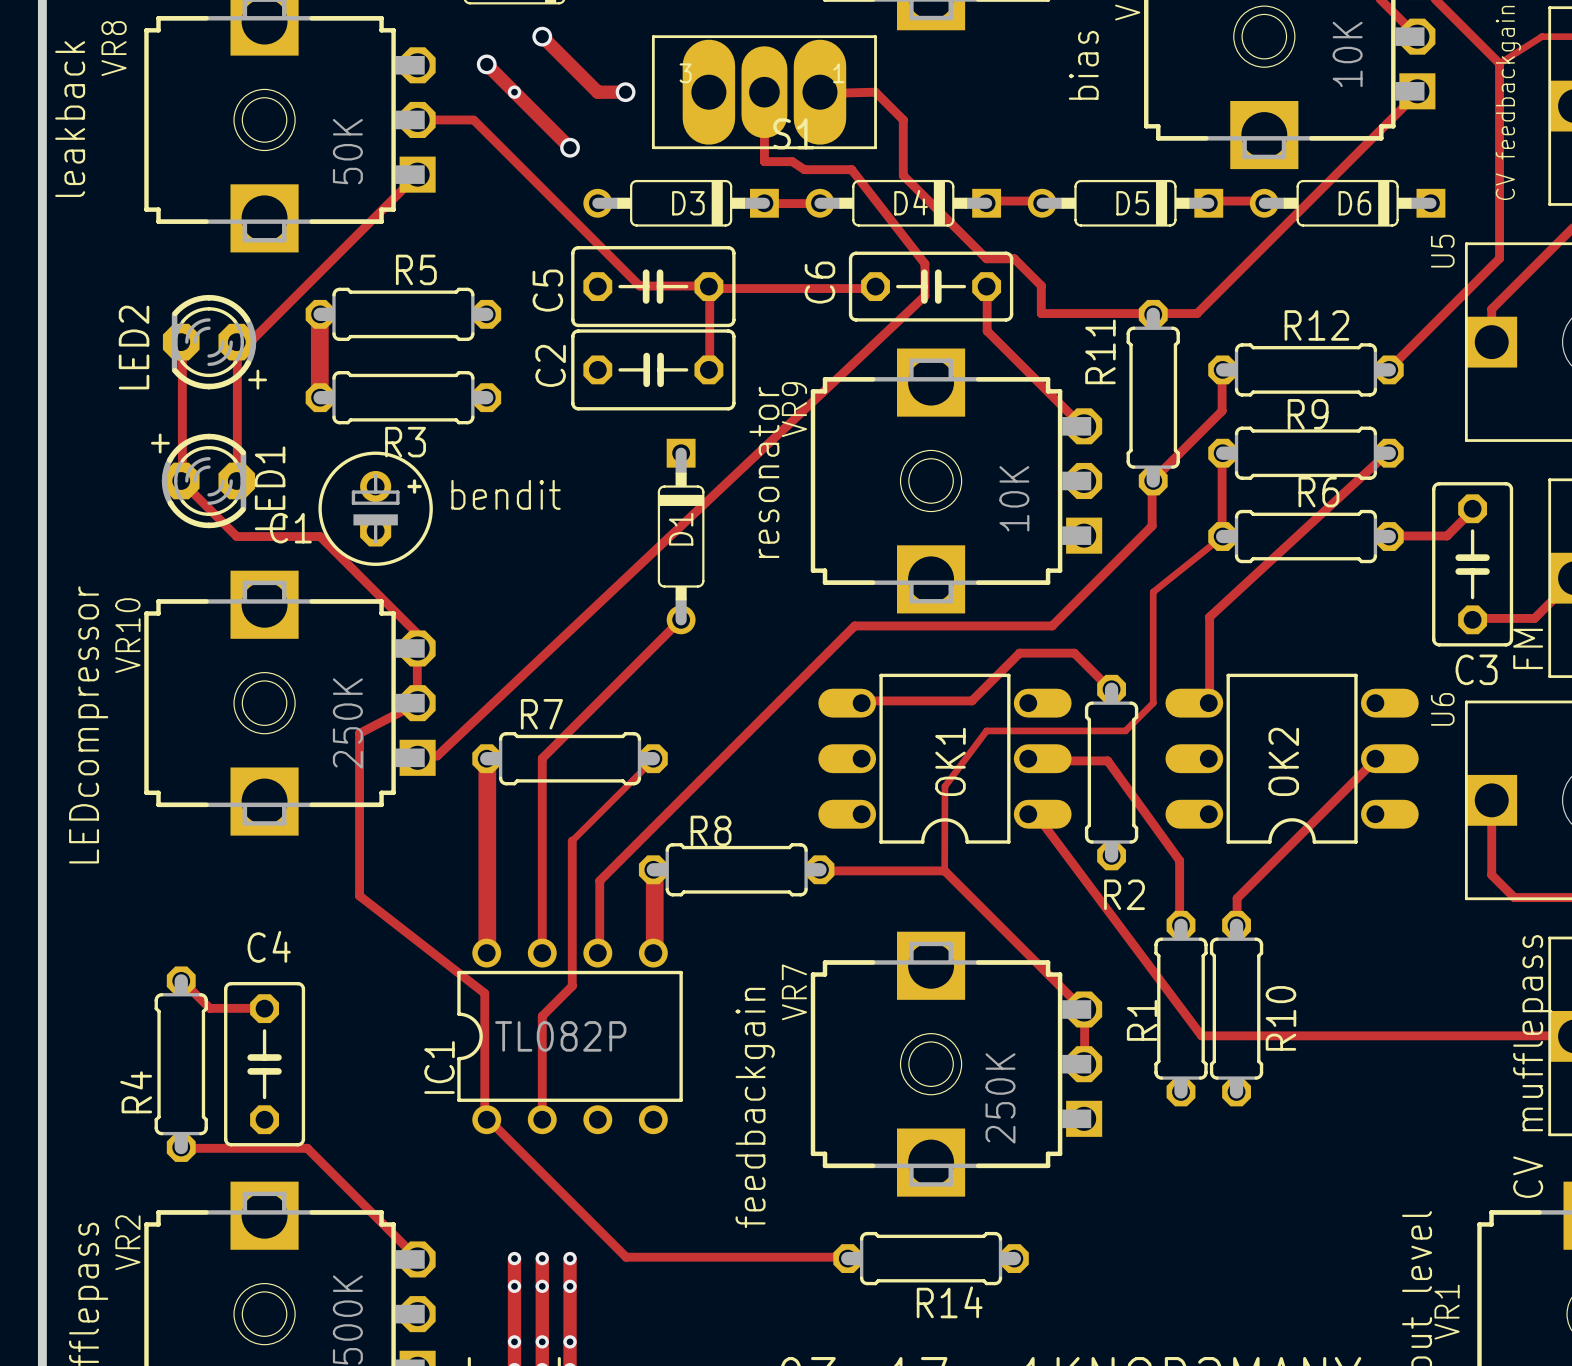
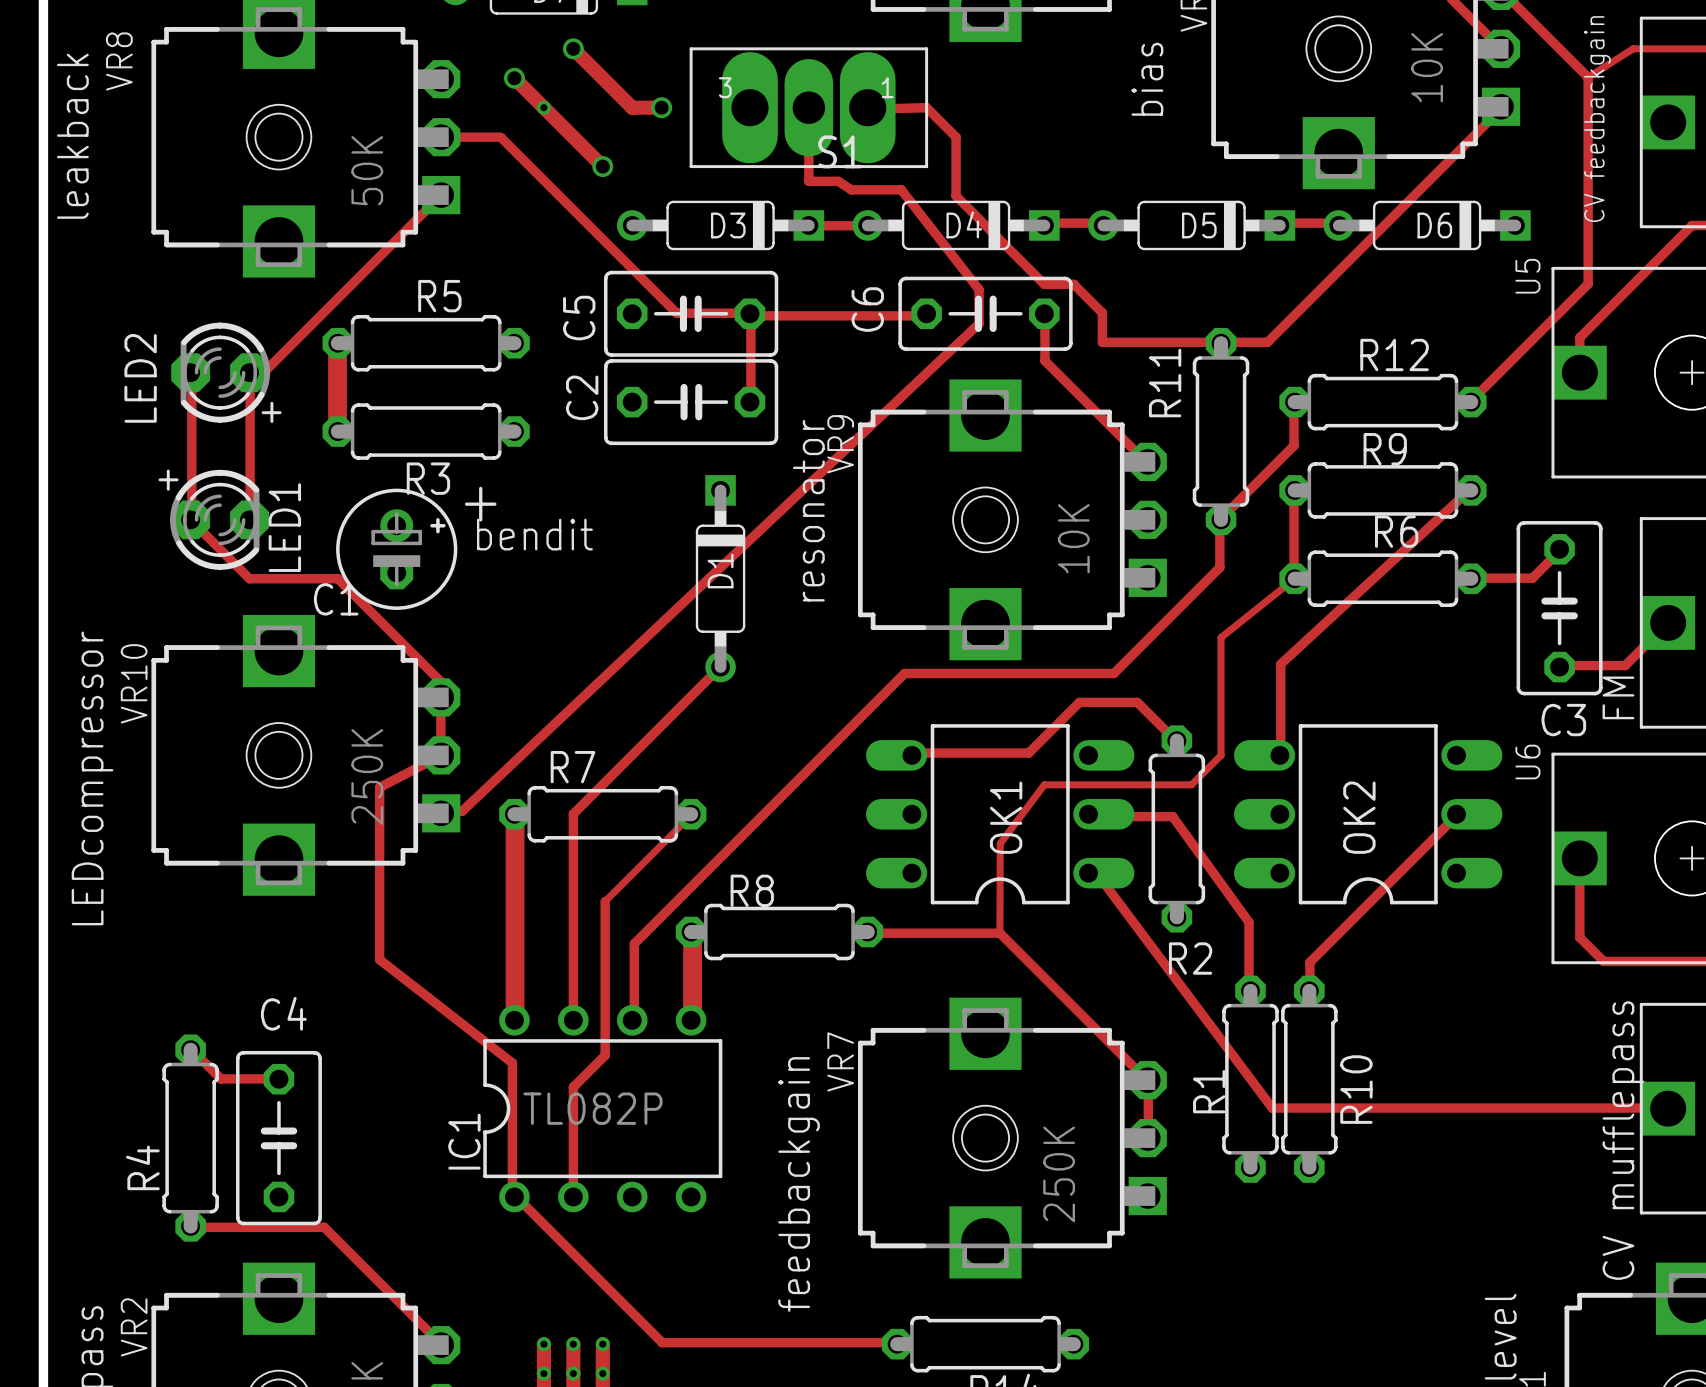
text: none -> + (480, 504)
C1 name position: C1 (290, 528) -> C1 (336, 599)

